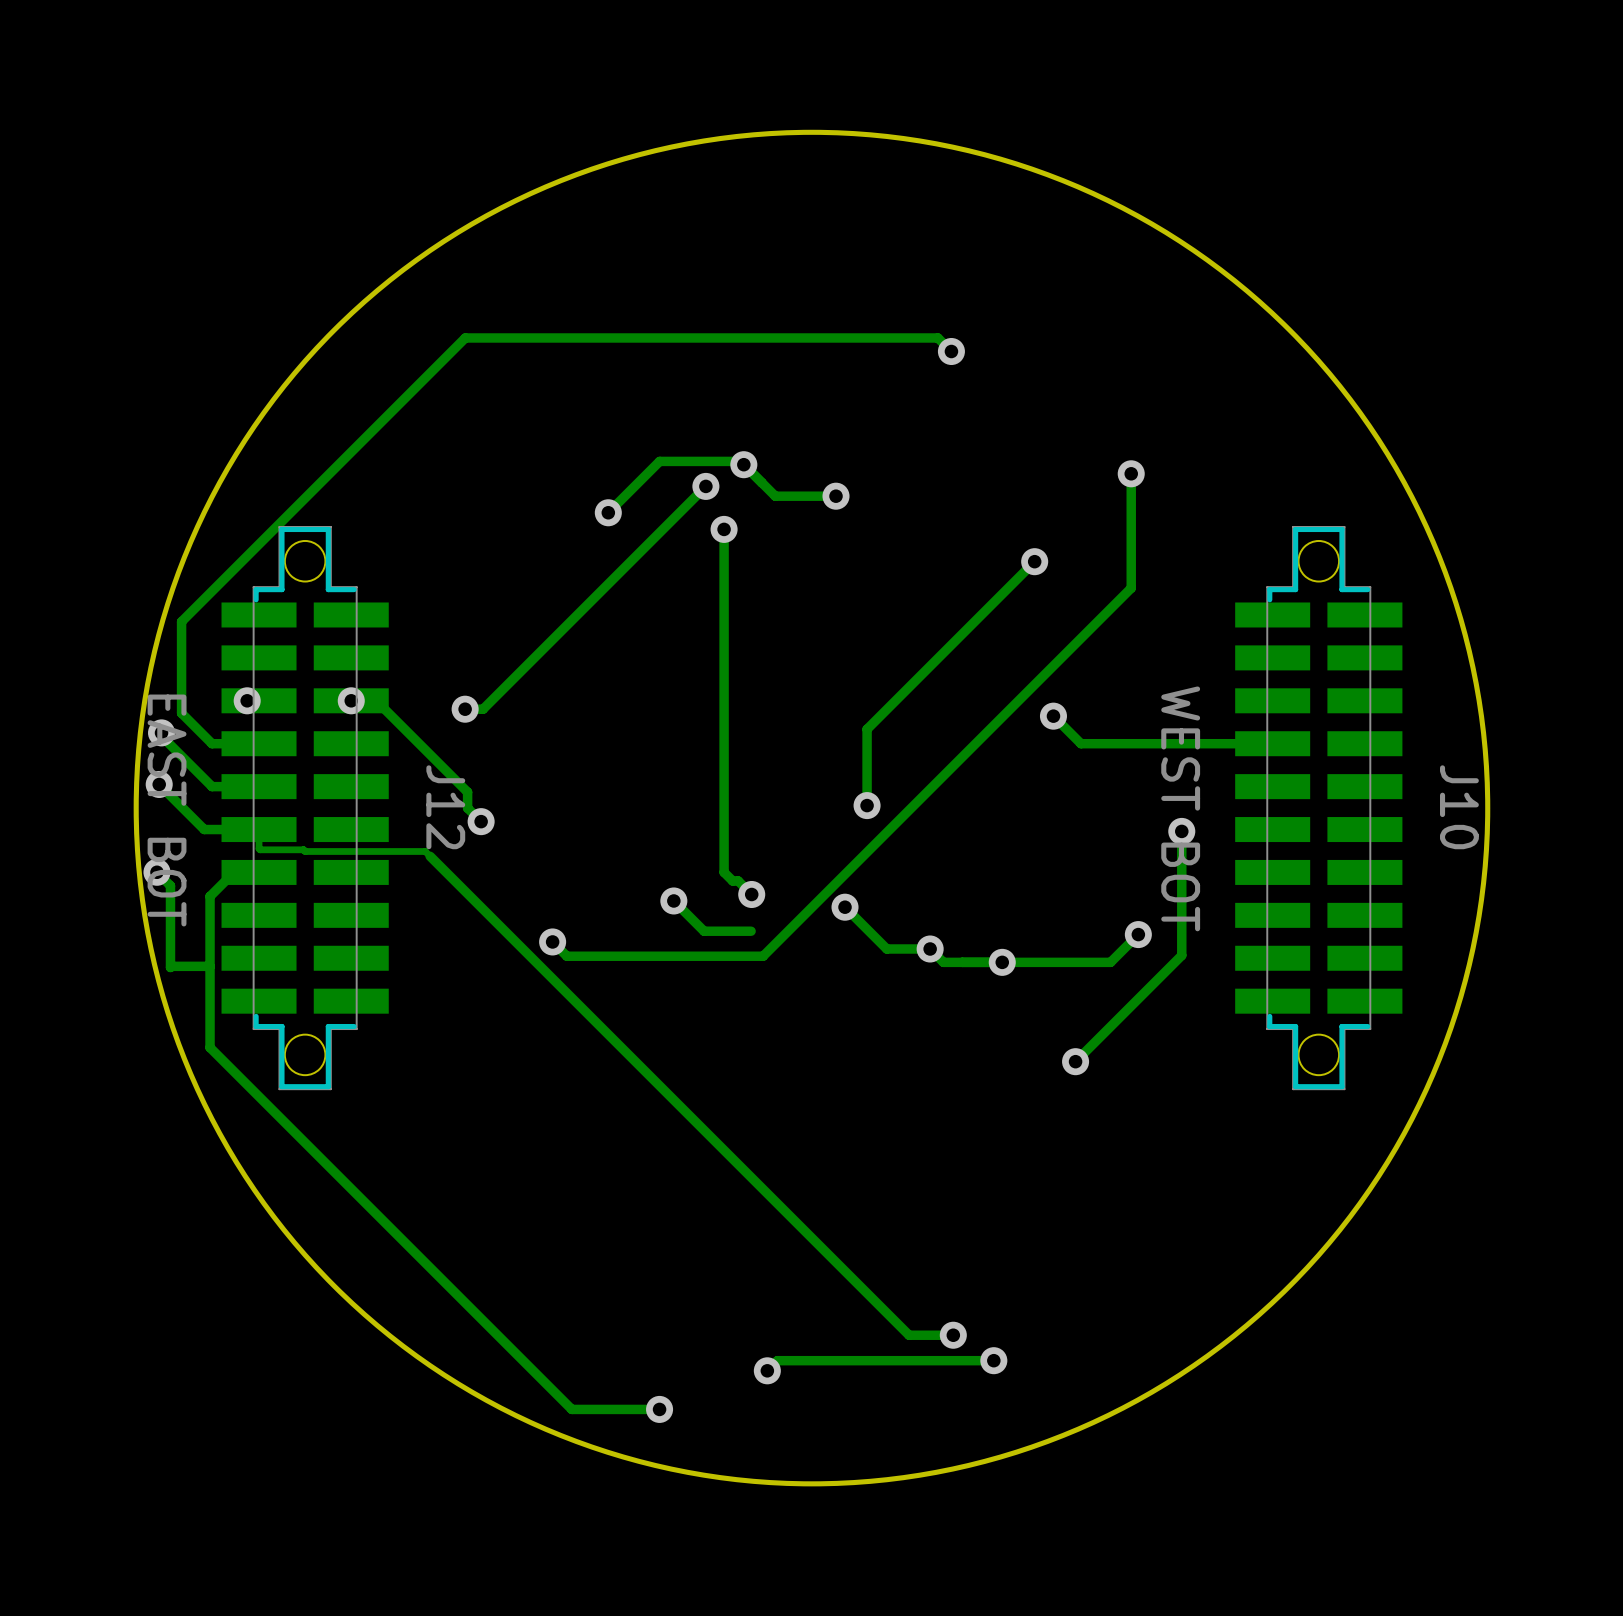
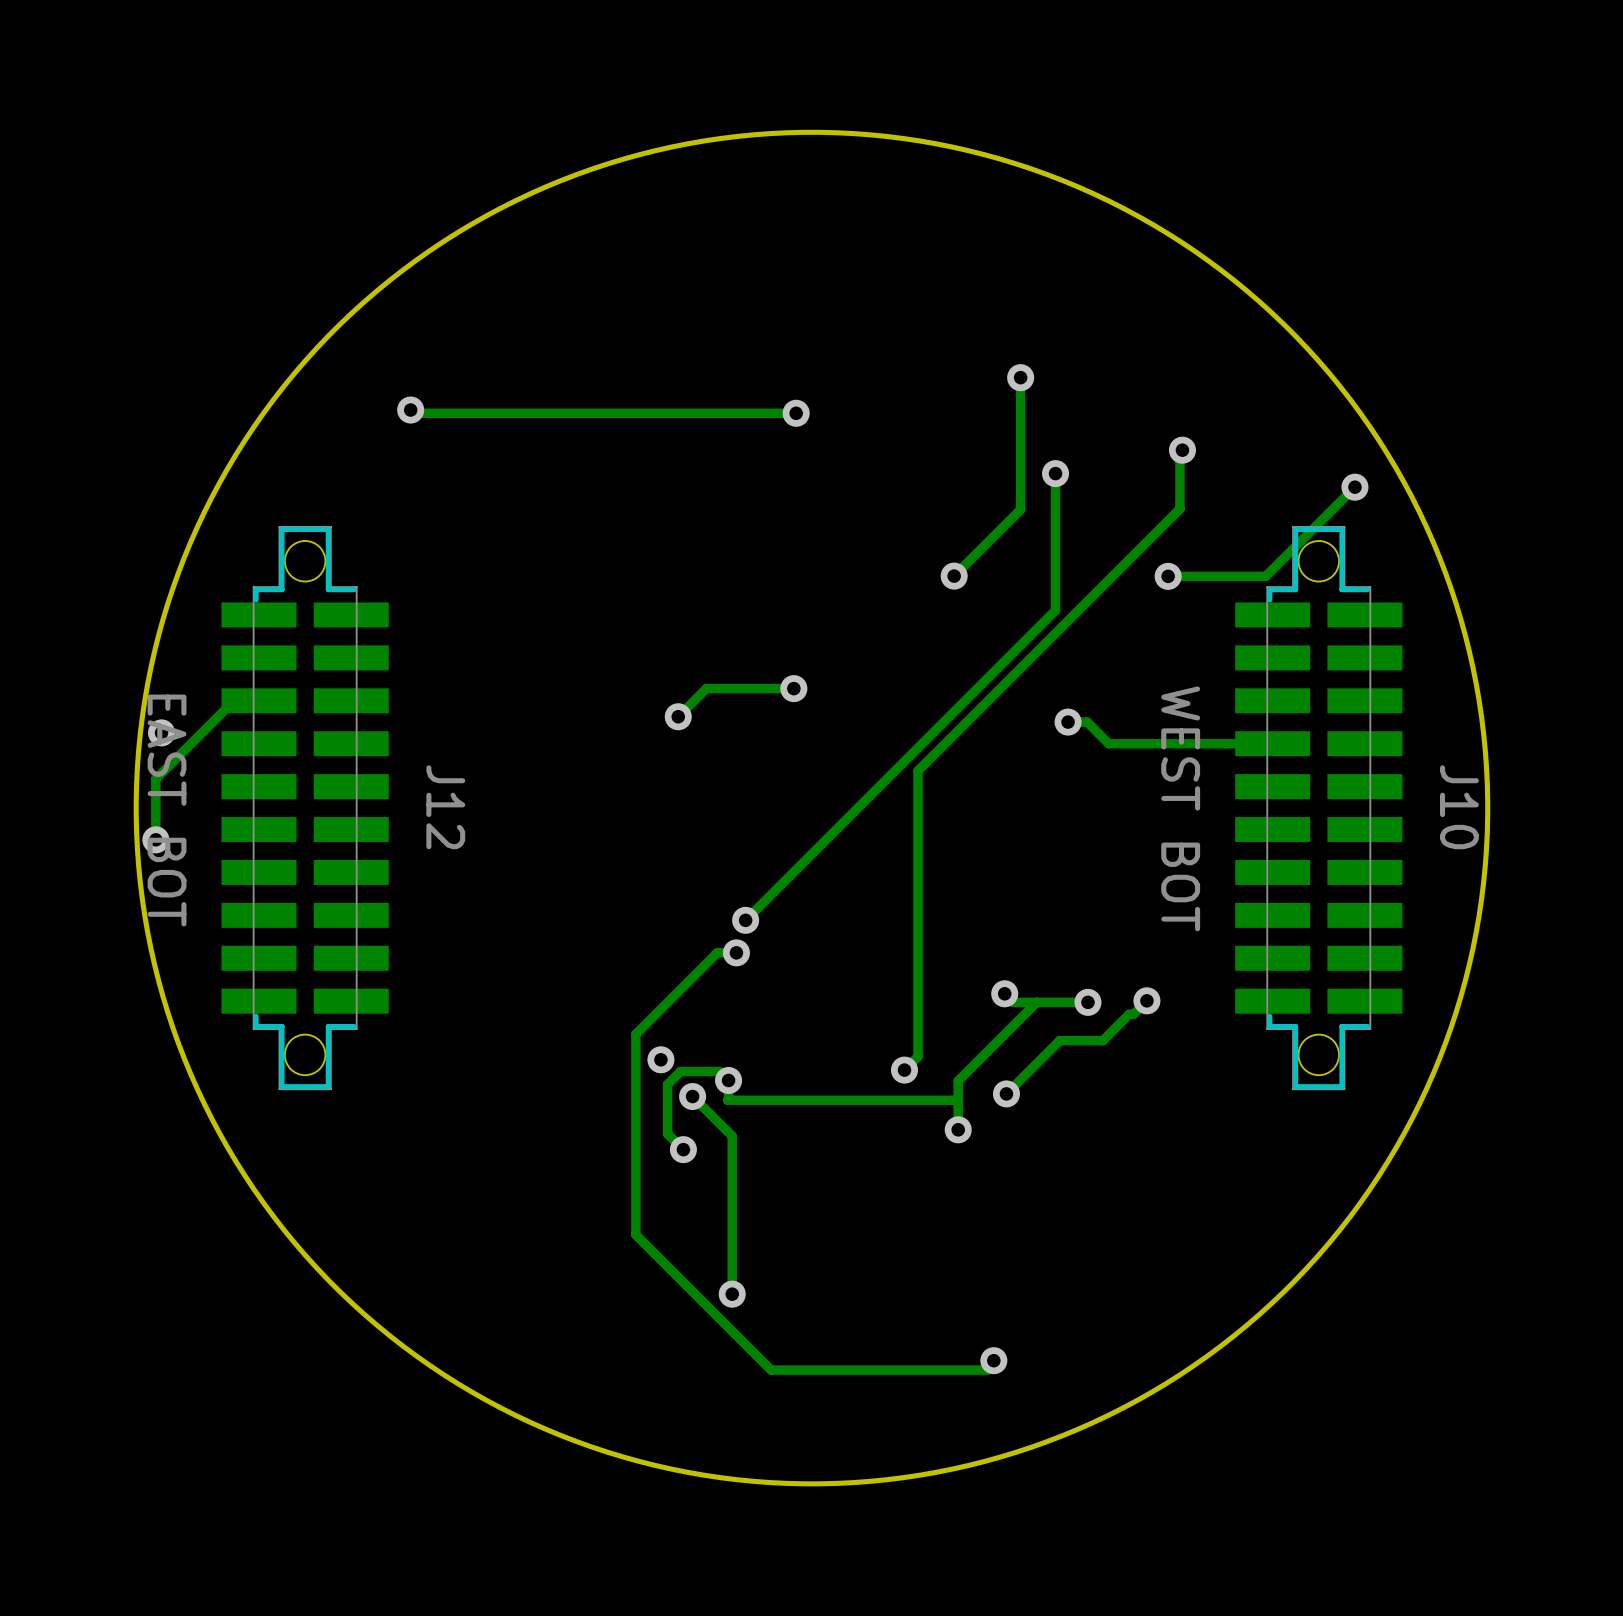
track: (951, 351) (937, 337) (465, 337) (181, 621) (181, 713) (212, 743) (259, 743) -> none
via: (951, 351) -> none
track: none -> (1020, 377) (1020, 509) (954, 576)
via: none -> (1020, 377)
track: none -> (410, 410) (413, 413) (796, 413)
via: none -> (410, 410)
via: none -> (796, 413)
track: none -> (1182, 450) (1179, 452) (1179, 508) (918, 770) (918, 1056) (904, 1070)
via: none -> (1182, 450)
via: (743, 464) -> none
track: none -> (1055, 473) (1055, 610) (745, 920)
via: none -> (1055, 473)
track: (1131, 473) (1131, 588) (763, 956) (566, 956) (552, 941) -> none
via: (1131, 473) -> none
track: (705, 486) (483, 709) (465, 709) -> none
via: (705, 486) -> none
track: none -> (1354, 487) (1265, 576) (1168, 576)
via: none -> (1354, 487)
track: (836, 496) (775, 496) (740, 461) (659, 461) (608, 512) -> none
via: (836, 496) -> none
via: (608, 512) -> none
track: (724, 529) (724, 872) (732, 880) (738, 880) (751, 894) -> none
via: (724, 529) -> none
track: (1034, 561) (867, 729) (867, 805) -> none
via: (1034, 561) -> none
via: none -> (954, 576)
via: none -> (1168, 576)
track: none -> (793, 688) (706, 688) (678, 716)
via: none -> (793, 688)
track: none -> (247, 700) (234, 700) (155, 778) (155, 839)
via: (247, 700) -> none
track: (351, 700) (376, 700) (467, 792) (467, 808) (481, 821) -> none
via: (351, 700) -> none
via: (465, 709) -> none
via: none -> (678, 716)
track: (1053, 716) (1081, 743) (1108, 743) -> (1068, 722) (1087, 722) (1108, 743)
via position: (1053, 716) -> (1068, 722)
track: (161, 732) (161, 736) (212, 786) (259, 786) -> none
track: (159, 784) (204, 829) (259, 829) (260, 849) (425, 851) (909, 1335) (953, 1335) -> none
via: (159, 784) -> none
via: (867, 805) -> none
via: (481, 821) -> none
track: (1181, 831) (1181, 955) (1075, 1061) -> none
via: (1181, 831) -> none
via: none -> (155, 839)
track: (156, 872) (170, 885) (170, 967) (210, 966) -> none
via: (156, 872) -> none
track: (259, 872) (234, 872) (210, 896) (210, 1047) (571, 1409) (659, 1409) -> none
via position: (751, 894) -> (745, 920)
track: (673, 900) (704, 931) (751, 931) -> none
via: (673, 900) -> none
track: (845, 907) (886, 948) (930, 948) (943, 962) (1110, 962) (1138, 934) -> none
via: (845, 907) -> none
via: (1138, 934) -> none
via: (552, 941) -> none
via: (930, 948) -> none
track: none -> (736, 952) (717, 952) (635, 1034) (635, 1234) (771, 1370) (988, 1370)
via: none -> (736, 952)
via position: (1002, 962) -> (1004, 993)
track: none -> (1004, 993) (1013, 1002) (1087, 1002)
track: none -> (1146, 1000) (1133, 1014) (1129, 1014) (1102, 1040) (1059, 1040) (1006, 1093)
via: none -> (1146, 1000)
track: none -> (1036, 1002) (958, 1080) (958, 1129)
via: none -> (1087, 1002)
via: none -> (660, 1059)
via: (1075, 1061) -> none
via: none -> (904, 1070)
via: none -> (728, 1080)
via: none -> (1006, 1093)
track: none -> (692, 1096) (732, 1136) (732, 1294)
via: none -> (692, 1096)
track: none -> (958, 1100) (727, 1100) (728, 1080) (719, 1071) (680, 1071) (667, 1084) (667, 1133) (683, 1149)
via: none -> (958, 1129)
via: none -> (683, 1149)
via: none -> (732, 1294)
via: (953, 1335) -> none
track: (993, 1360) (777, 1360) (767, 1370) -> none
via: (767, 1370) -> none
via: (659, 1409) -> none

